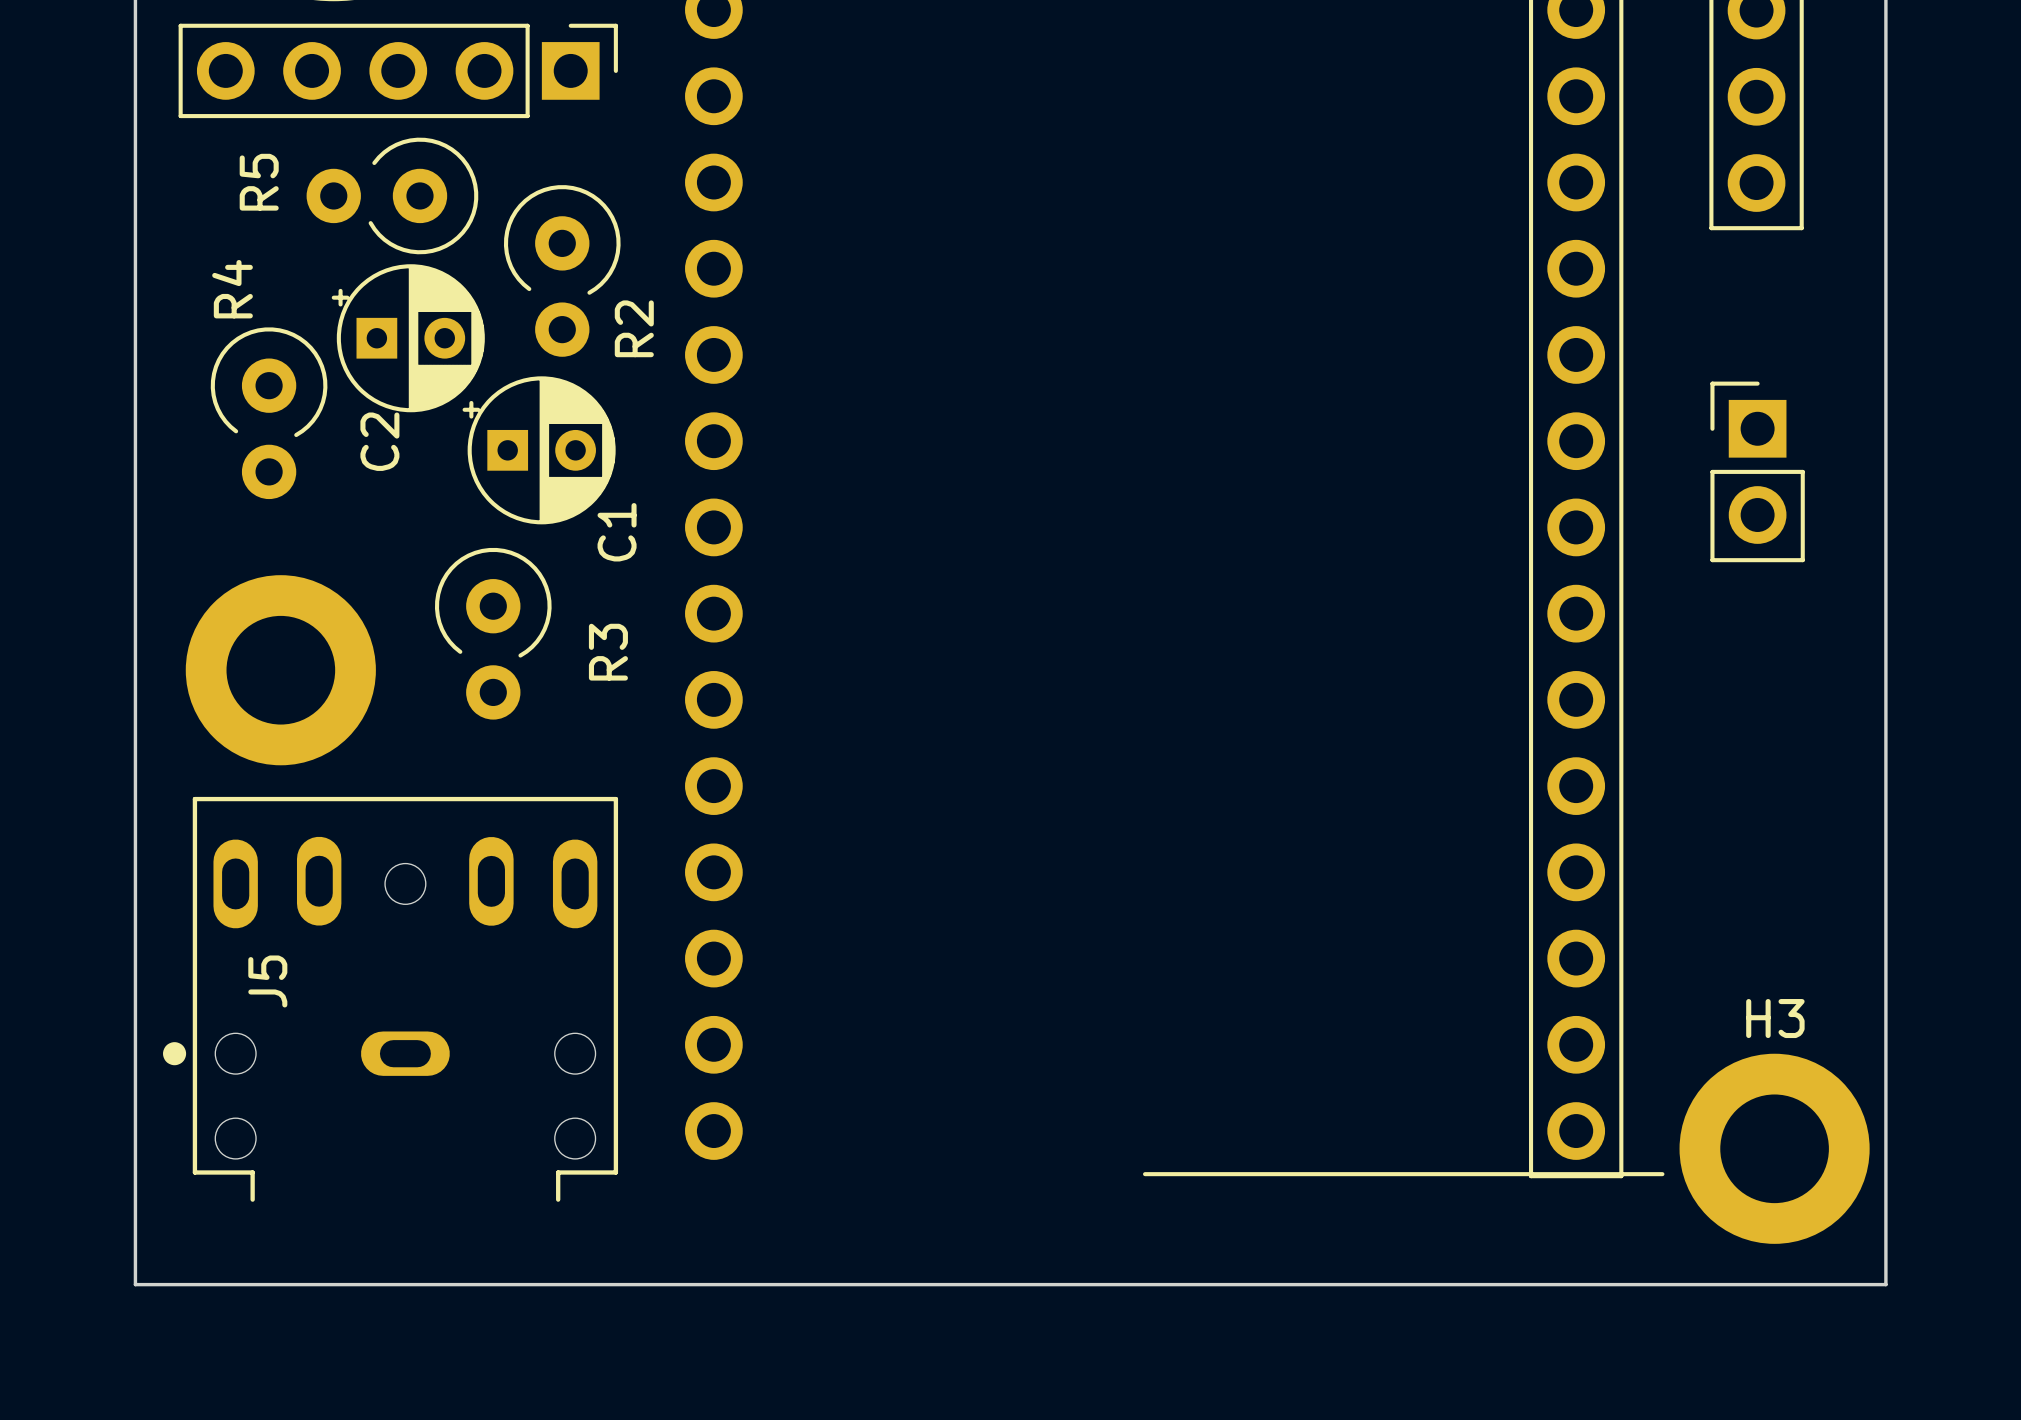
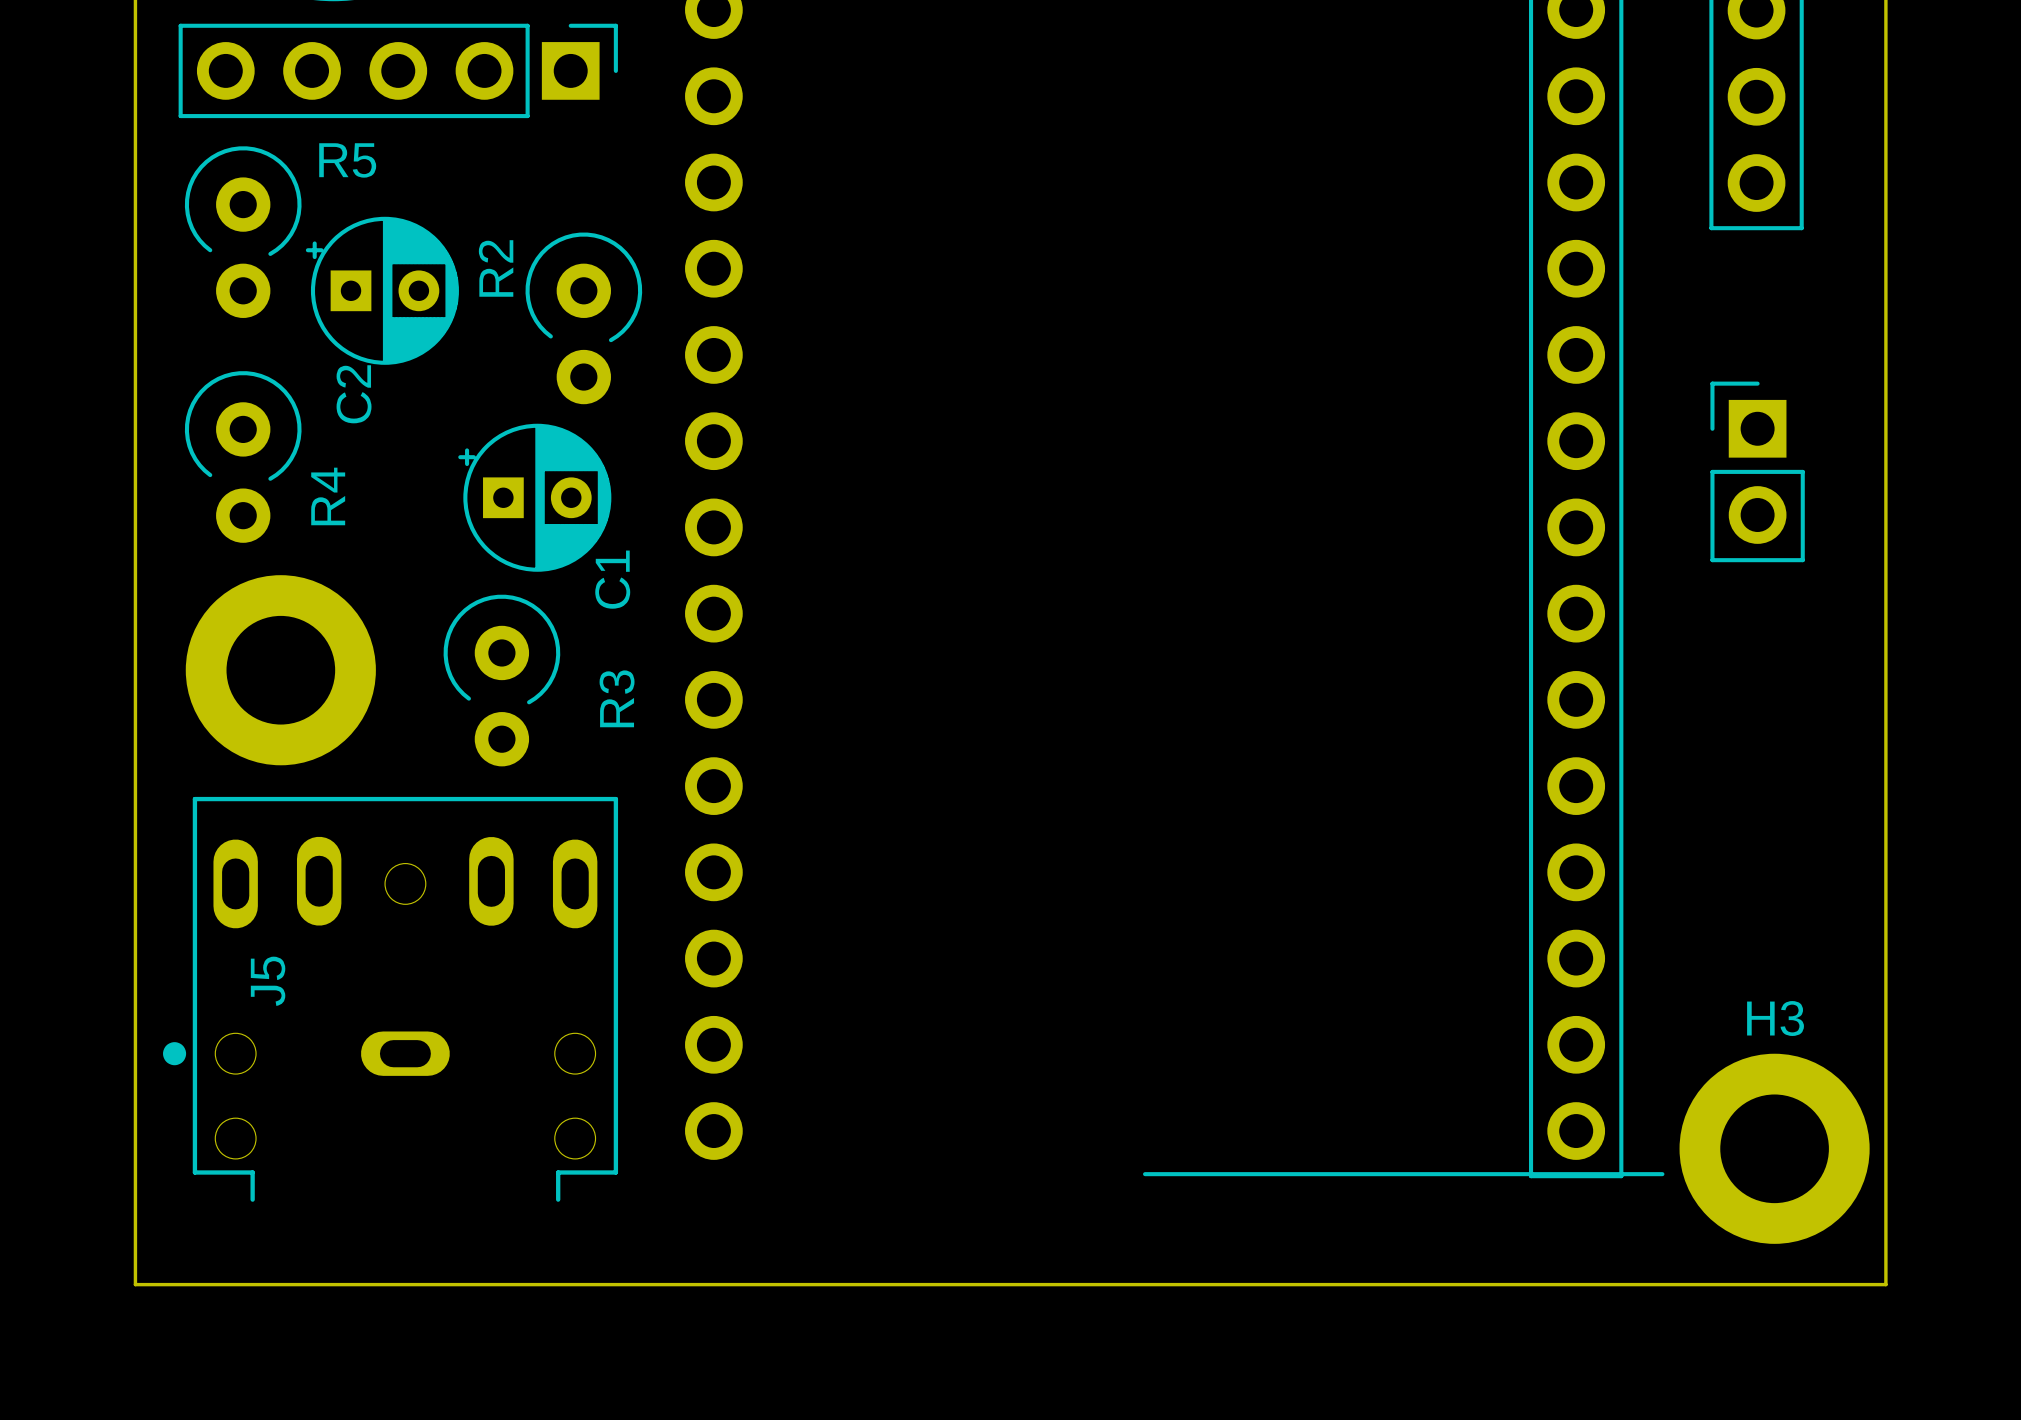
R5 name position: R5 (259, 182) -> R5 (347, 160)
R5 rotation: 0° (392, 195) -> 90° counterclockwise (243, 232)
R5 position: (392, 195) -> (243, 232)
R2 position: (562, 270) -> (583, 318)
R4 name position: R4 (232, 289) -> R4 (328, 496)
R2 name position: R2 (634, 328) -> R2 (496, 268)
C2 position: (408, 338) -> (382, 290)
R4 position: (269, 413) -> (243, 456)
C1 position: (539, 450) -> (534, 497)
R3 position: (493, 633) -> (501, 680)

